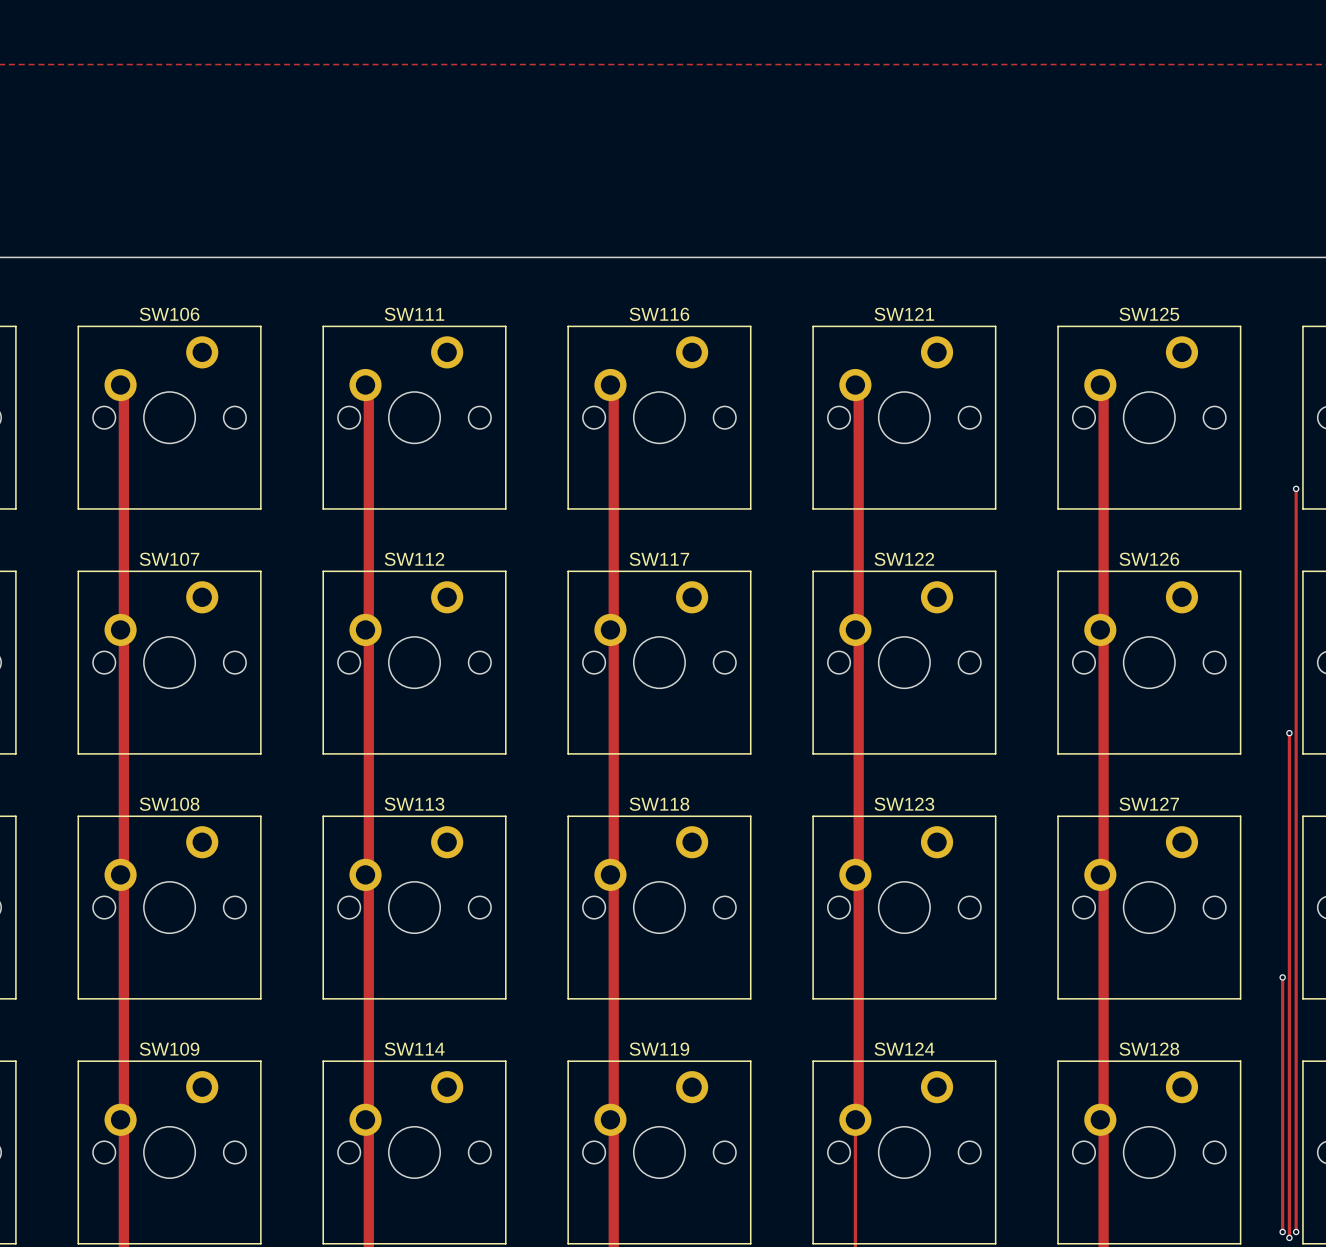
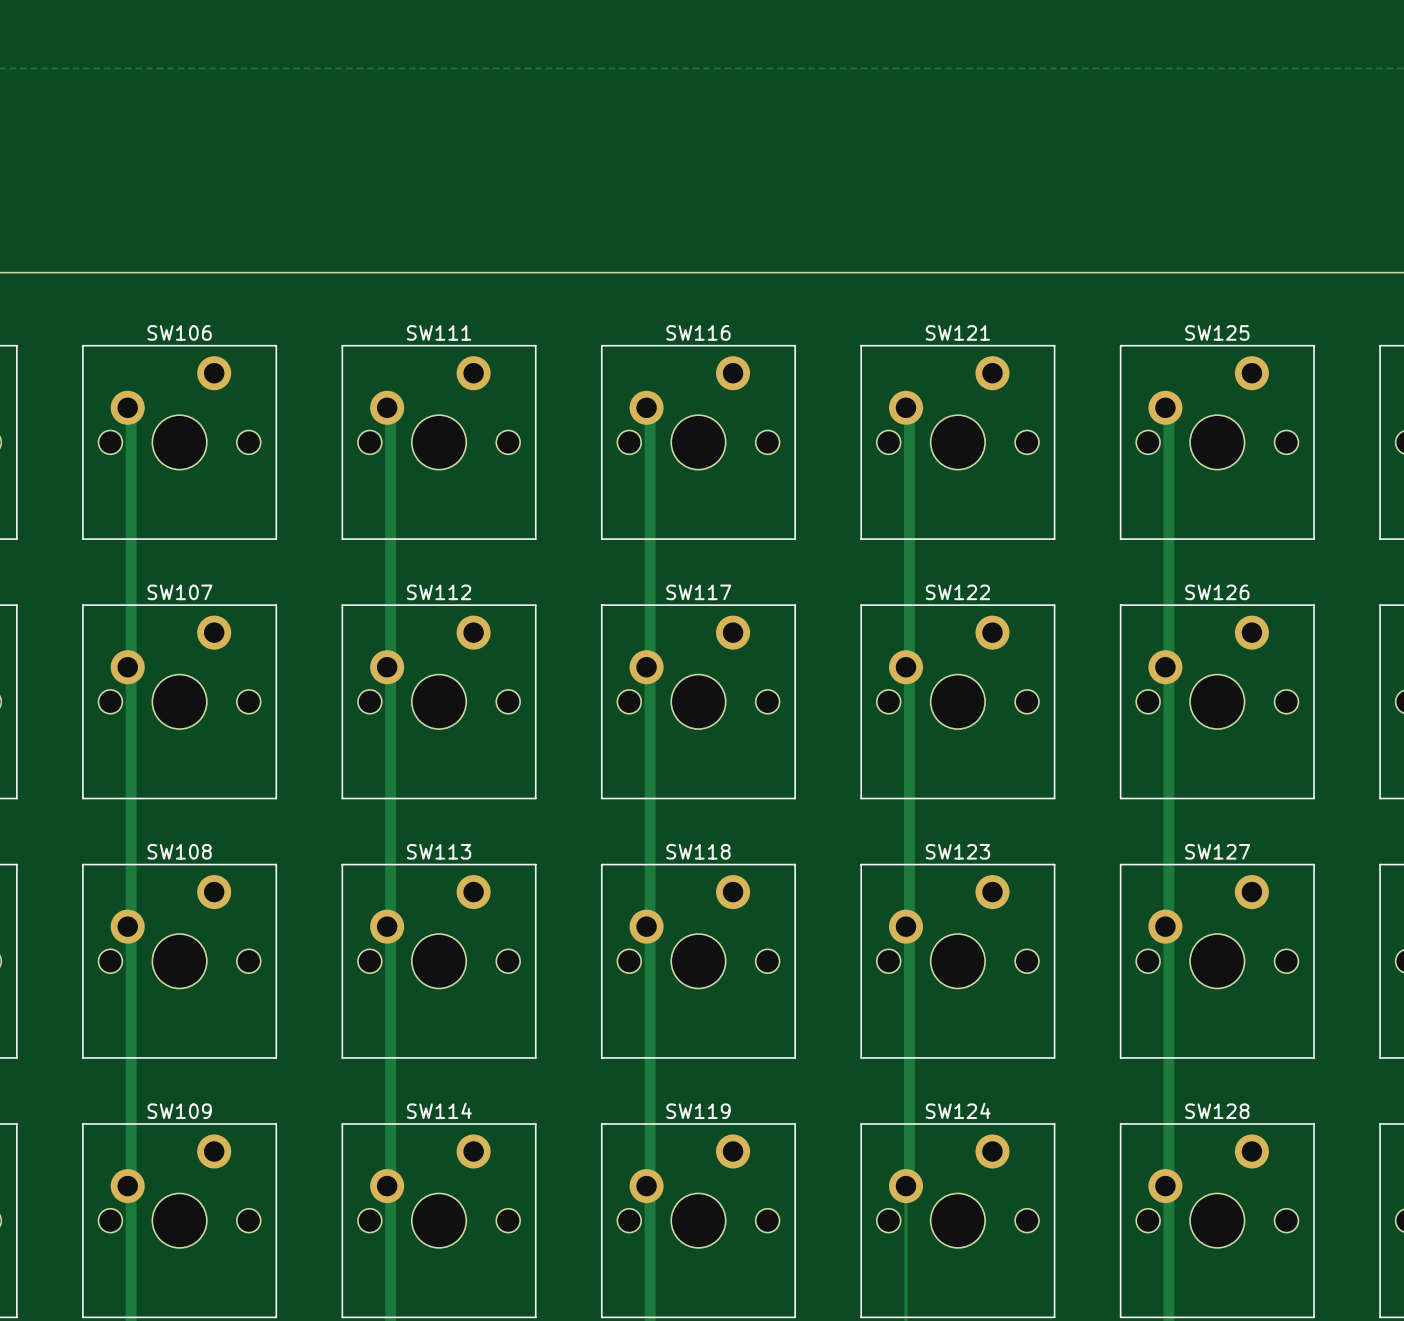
track: (1296, 488) (1296, 1232) -> none
via: (1296, 488) -> none
track: (1289, 733) (1289, 1237) -> none
via: (1289, 733) -> none
track: (1282, 977) (1282, 1232) -> none
via: (1282, 977) -> none
via: (1282, 1232) -> none
via: (1296, 1232) -> none
via: (1289, 1237) -> none

